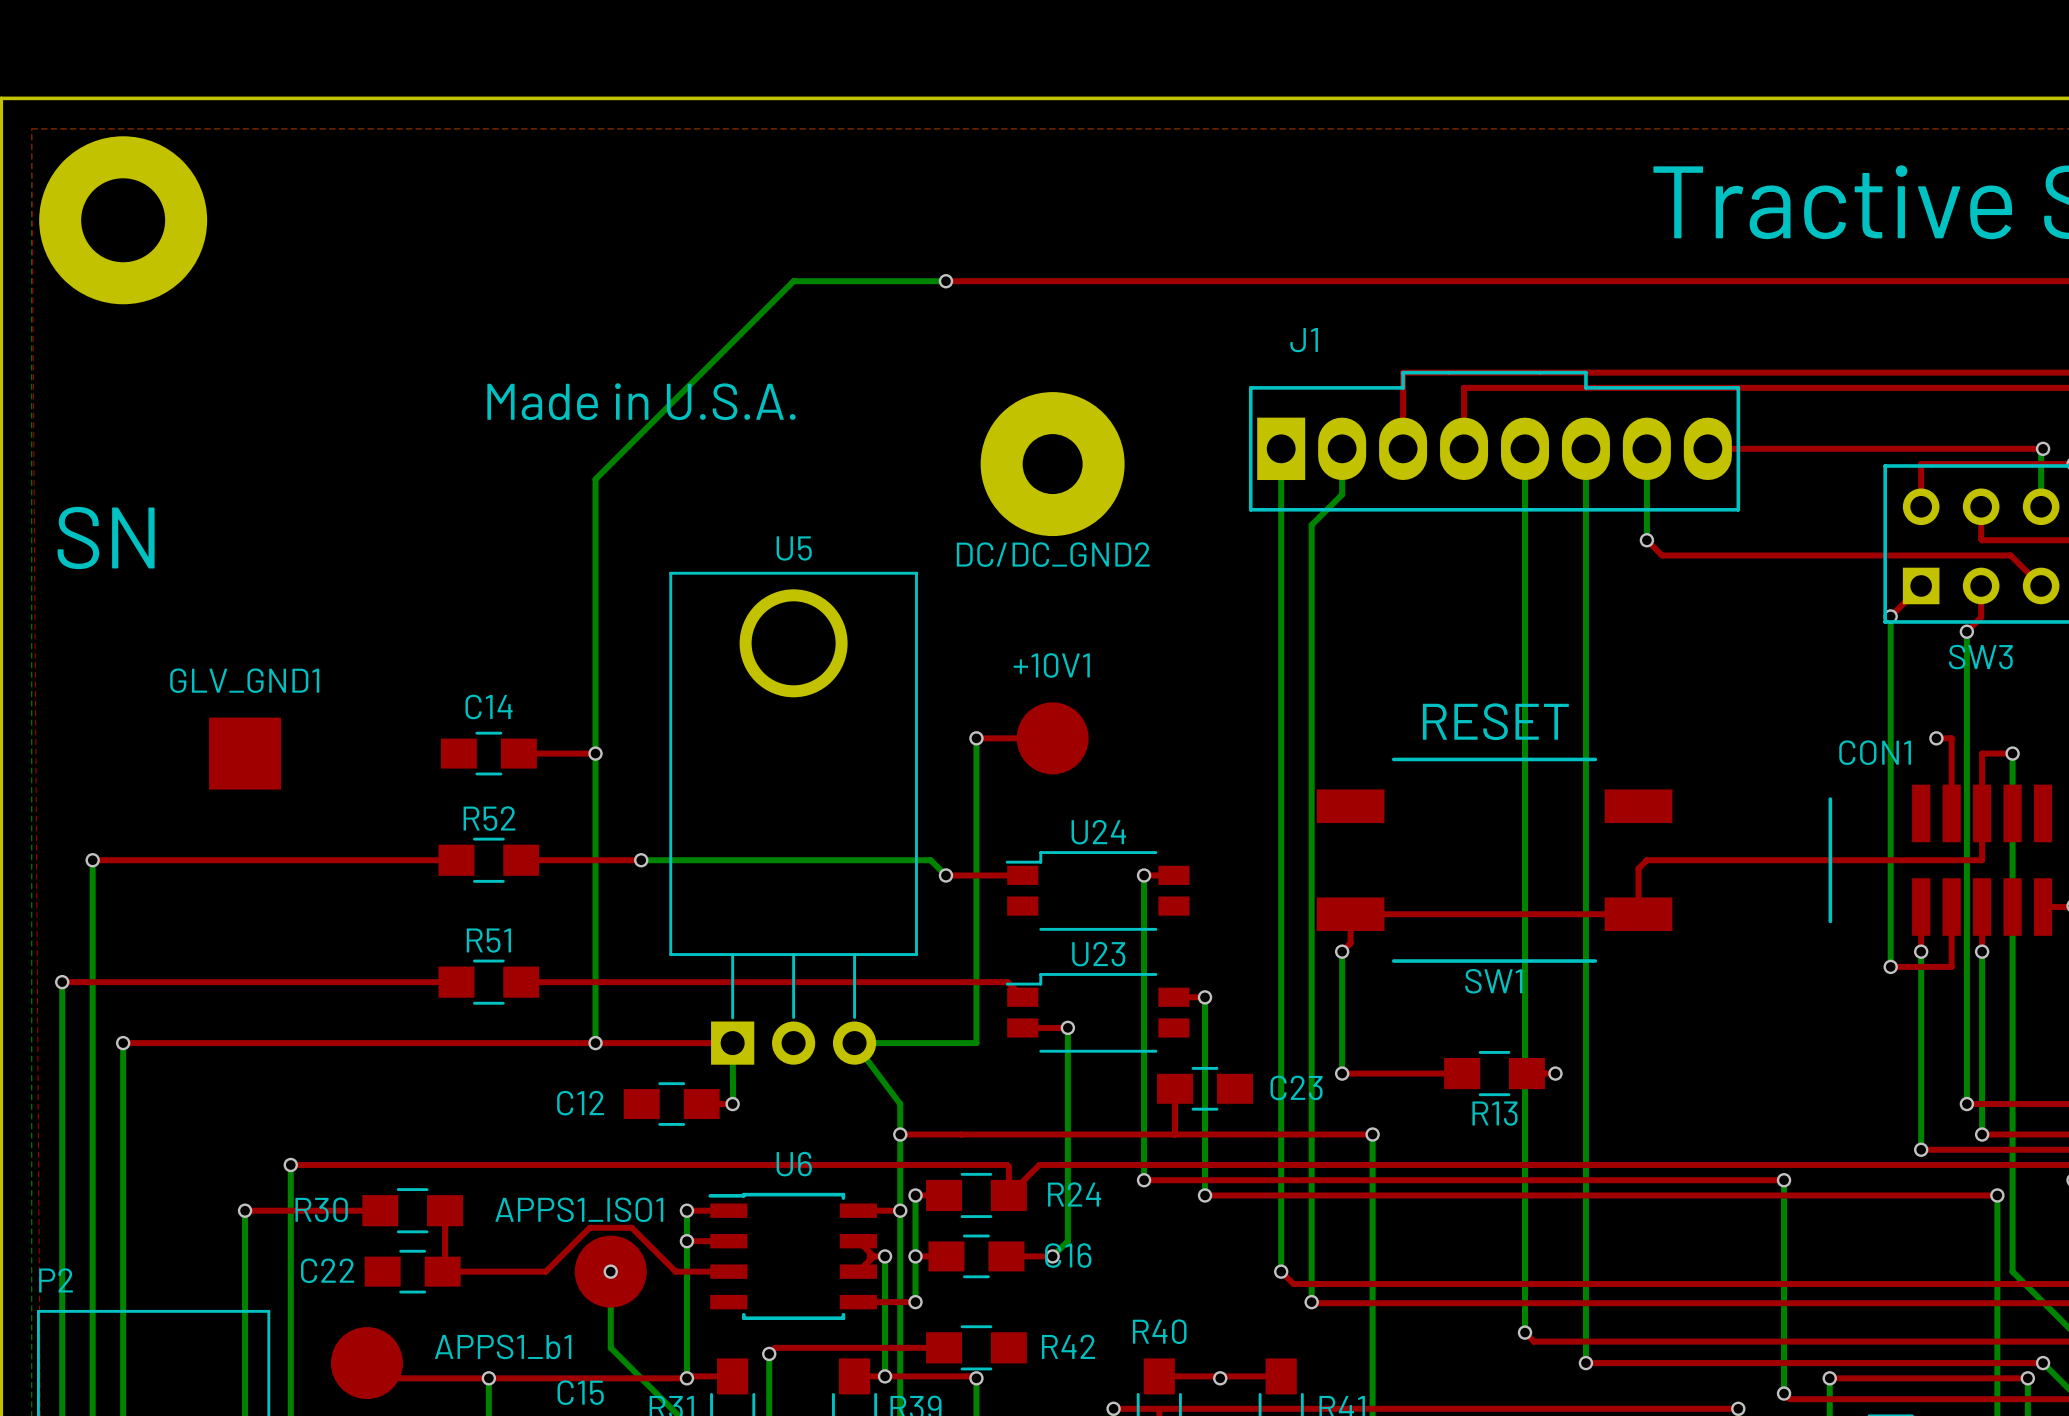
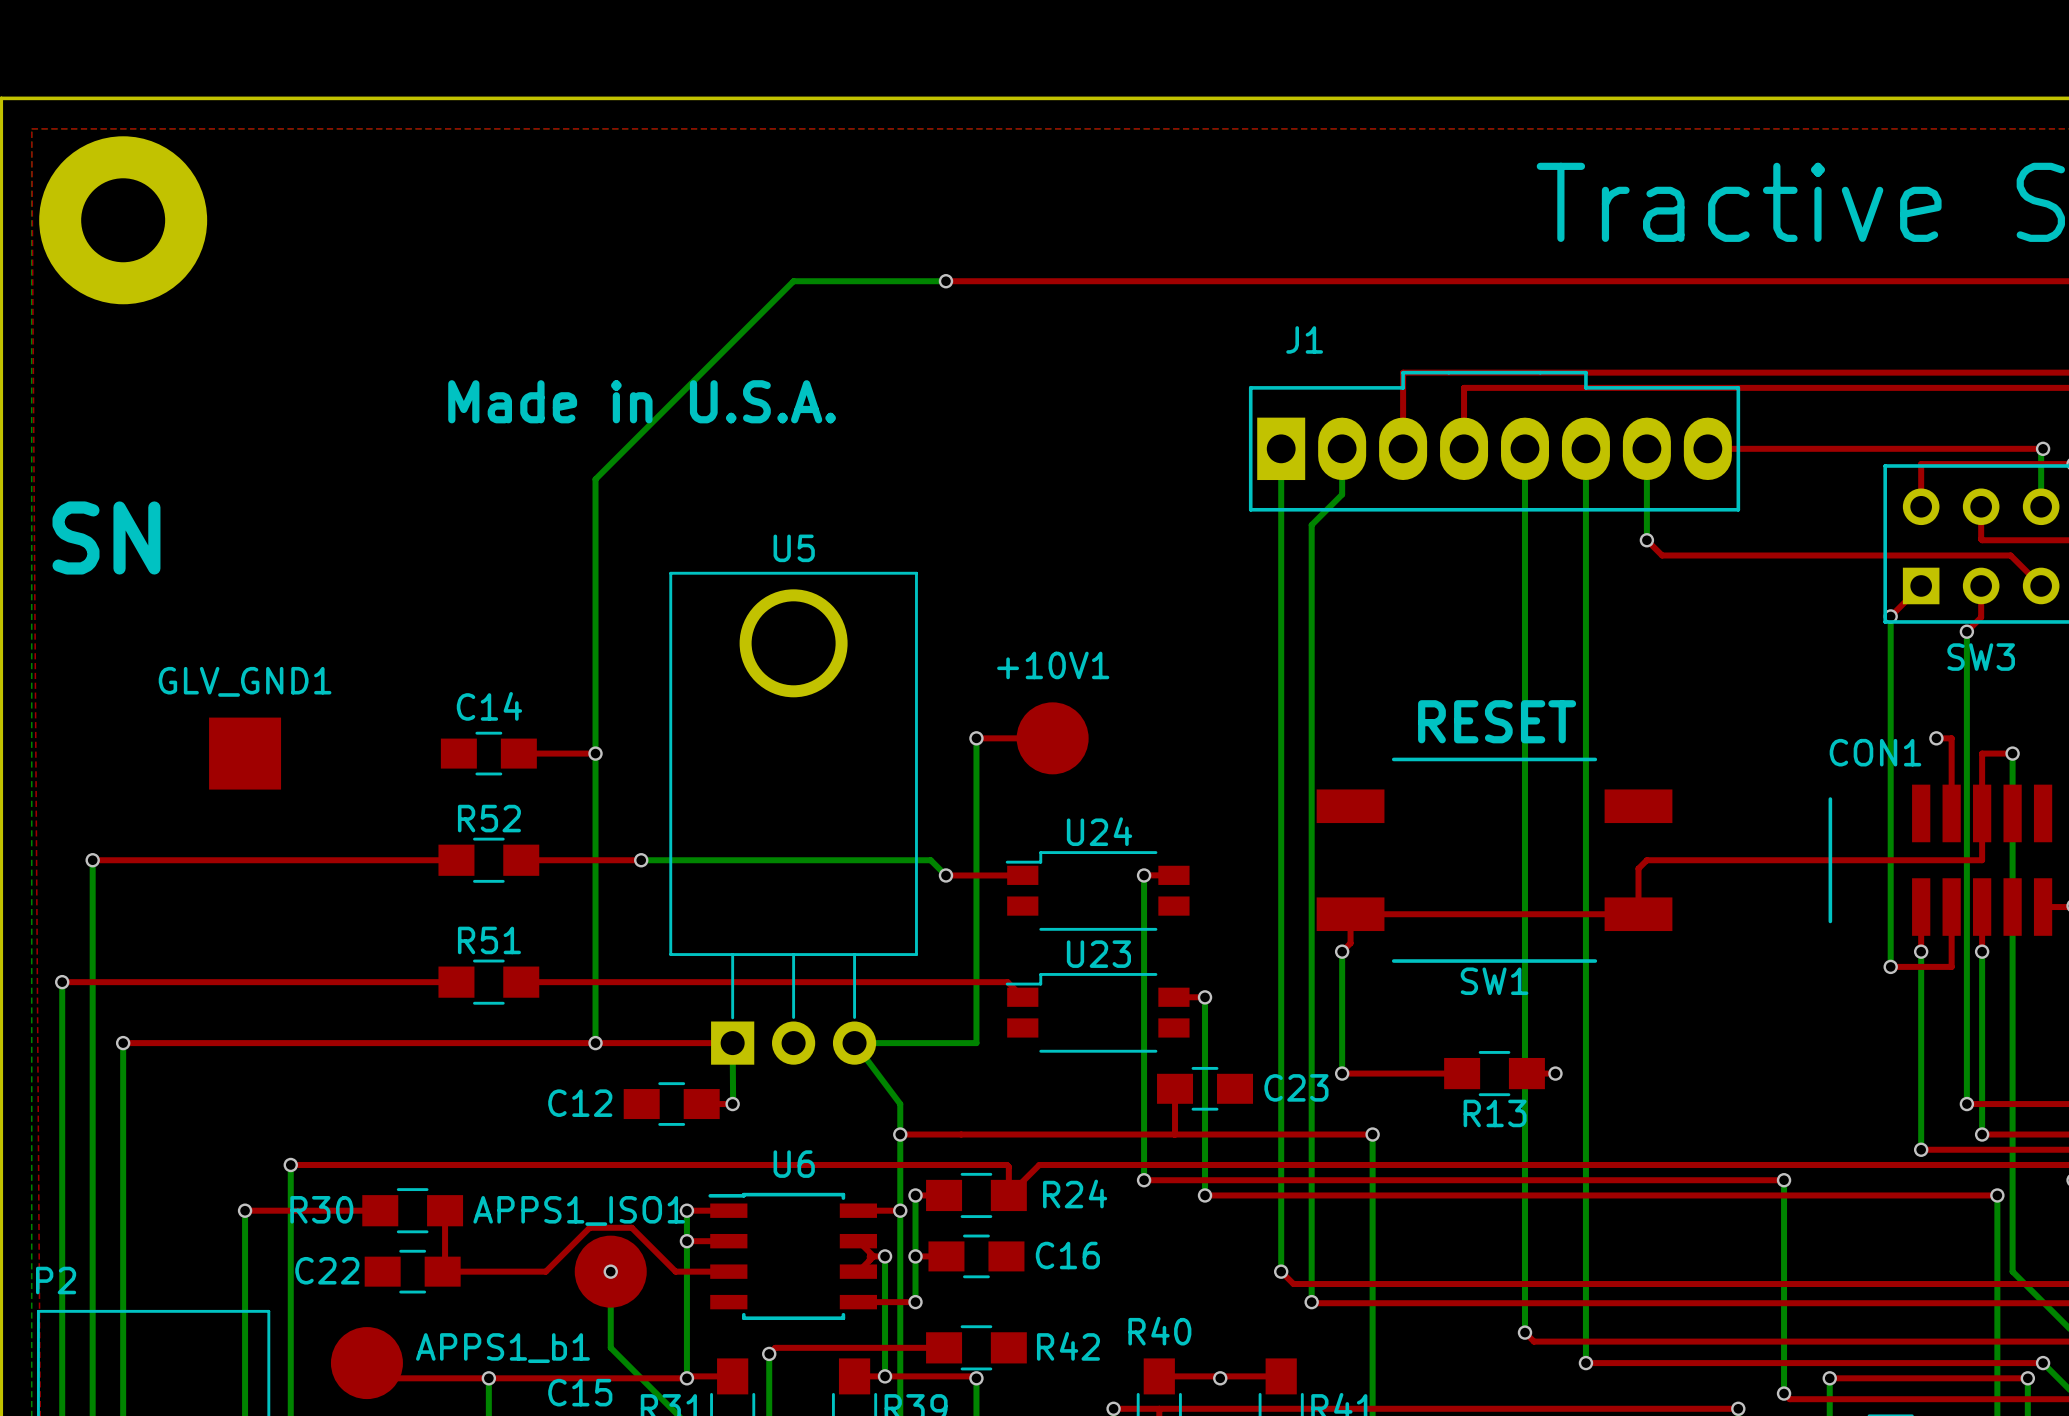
DC/DC_GND2: (1052, 464) -> none
top track: (1022, 1027) (1067, 1027) -> none
bottom track: (1067, 1027) (1067, 1241) (1052, 1256) -> none
via: (1067, 1027) -> none
top track: (1006, 1256) (1052, 1256) -> none
via: (1052, 1256) -> none

